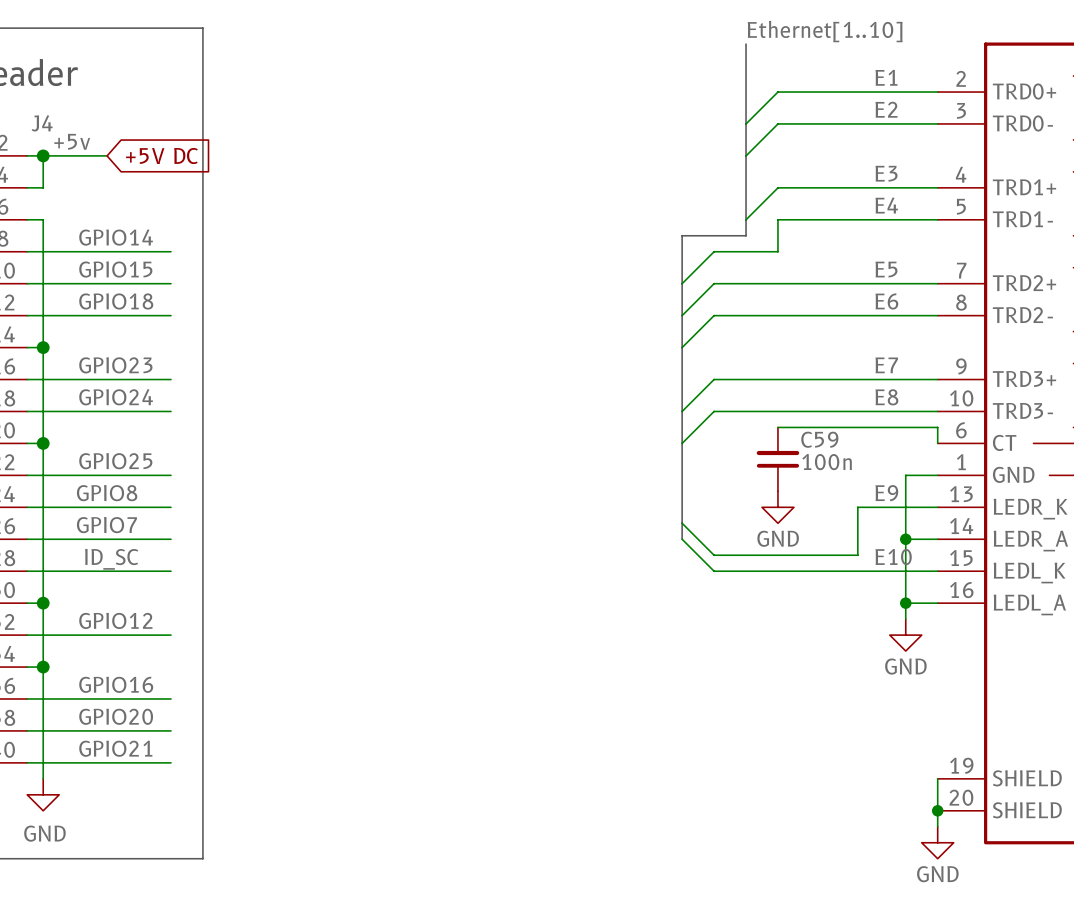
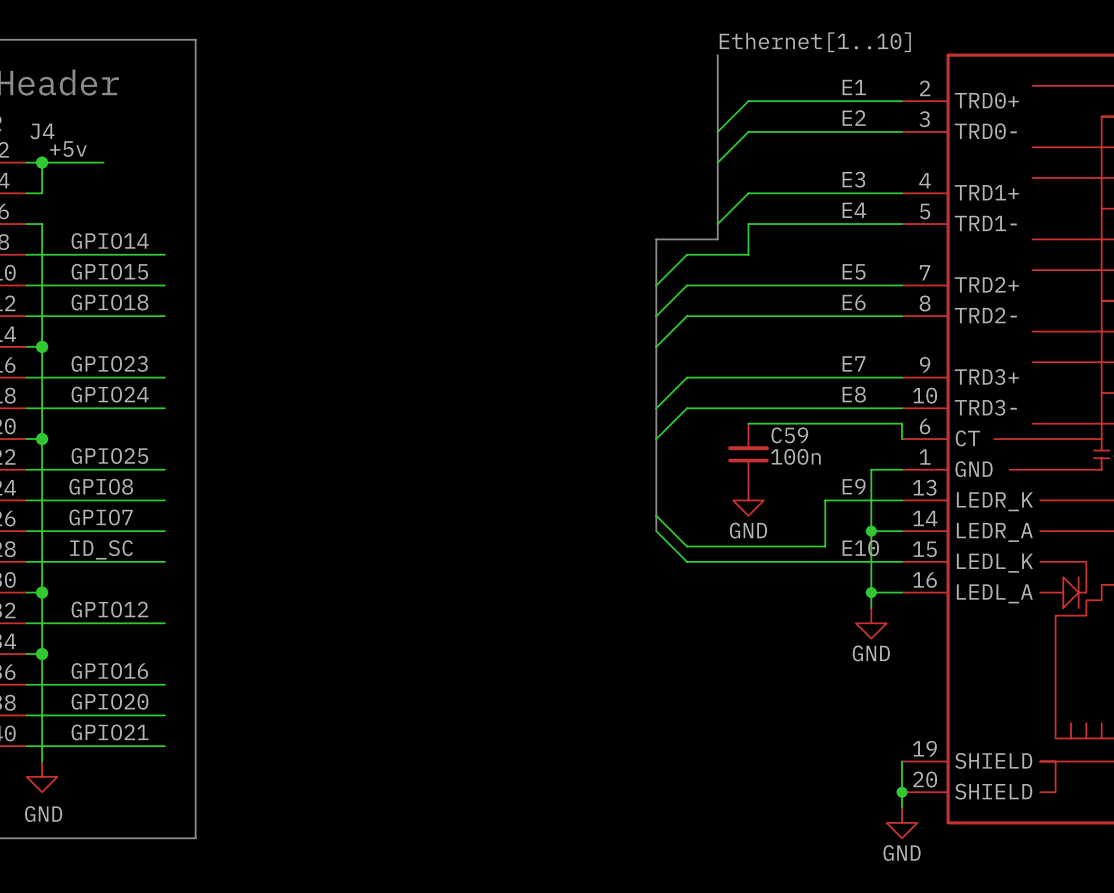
global label: +5V DC (161, 156) -> none

